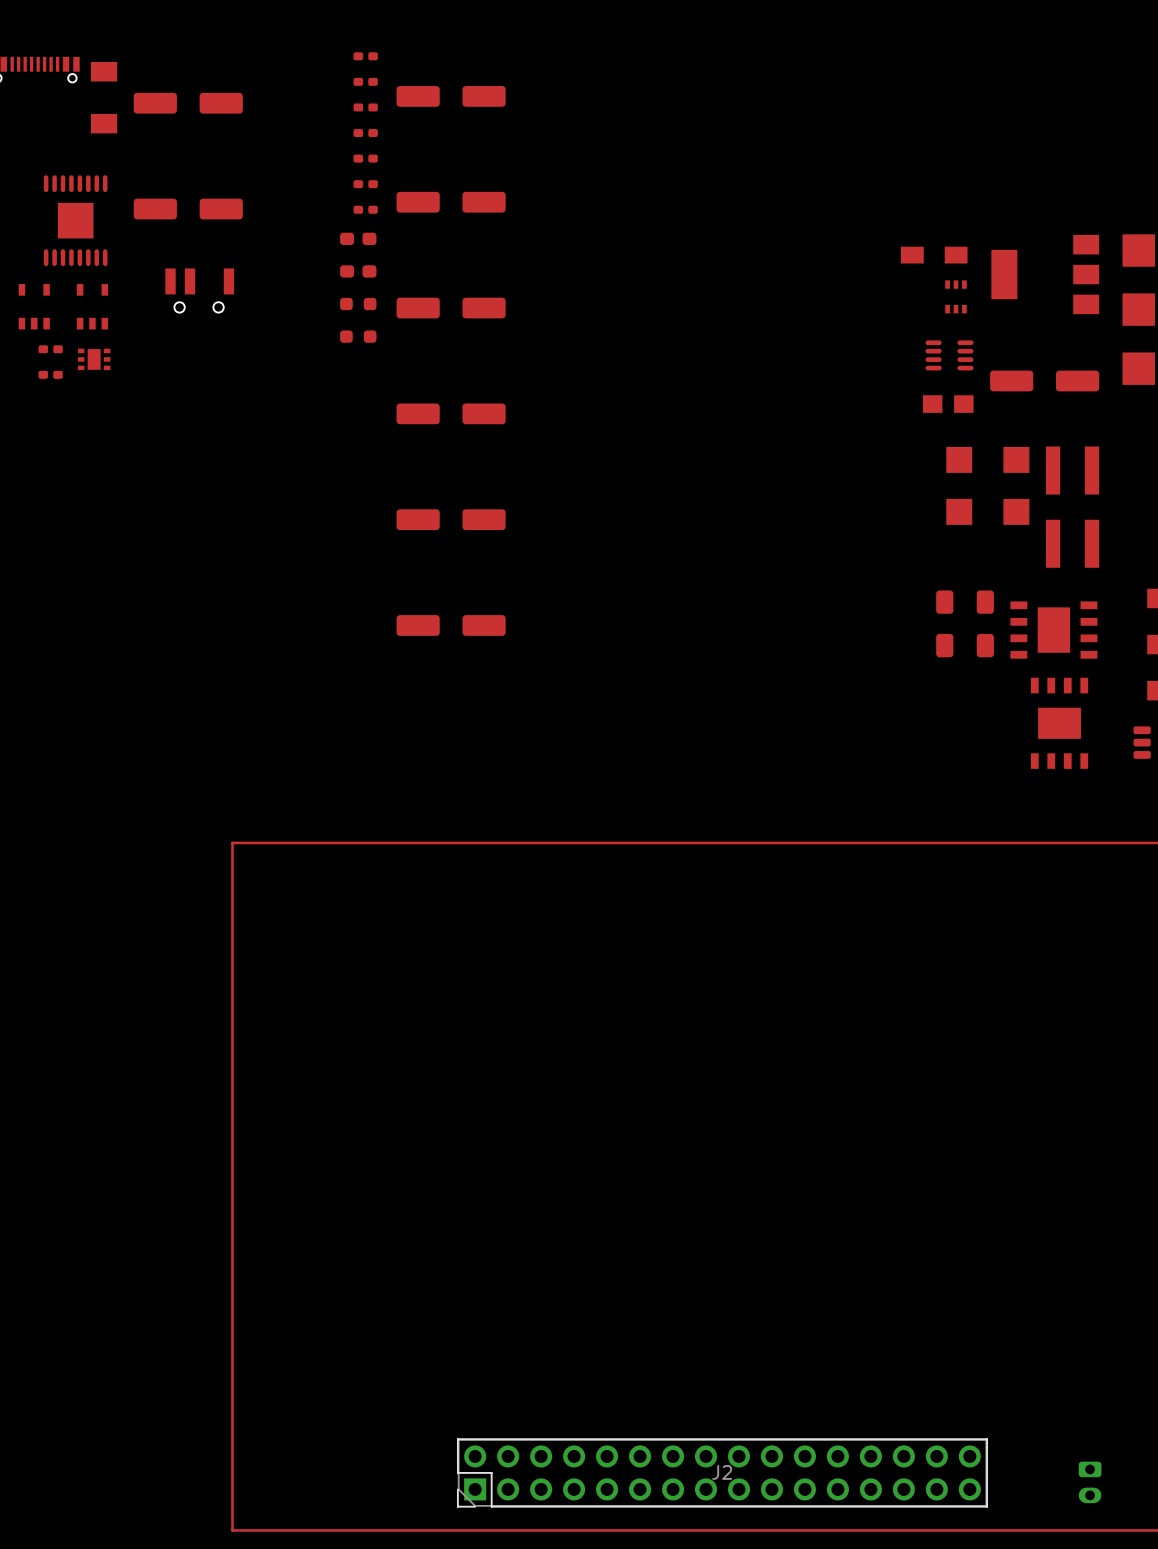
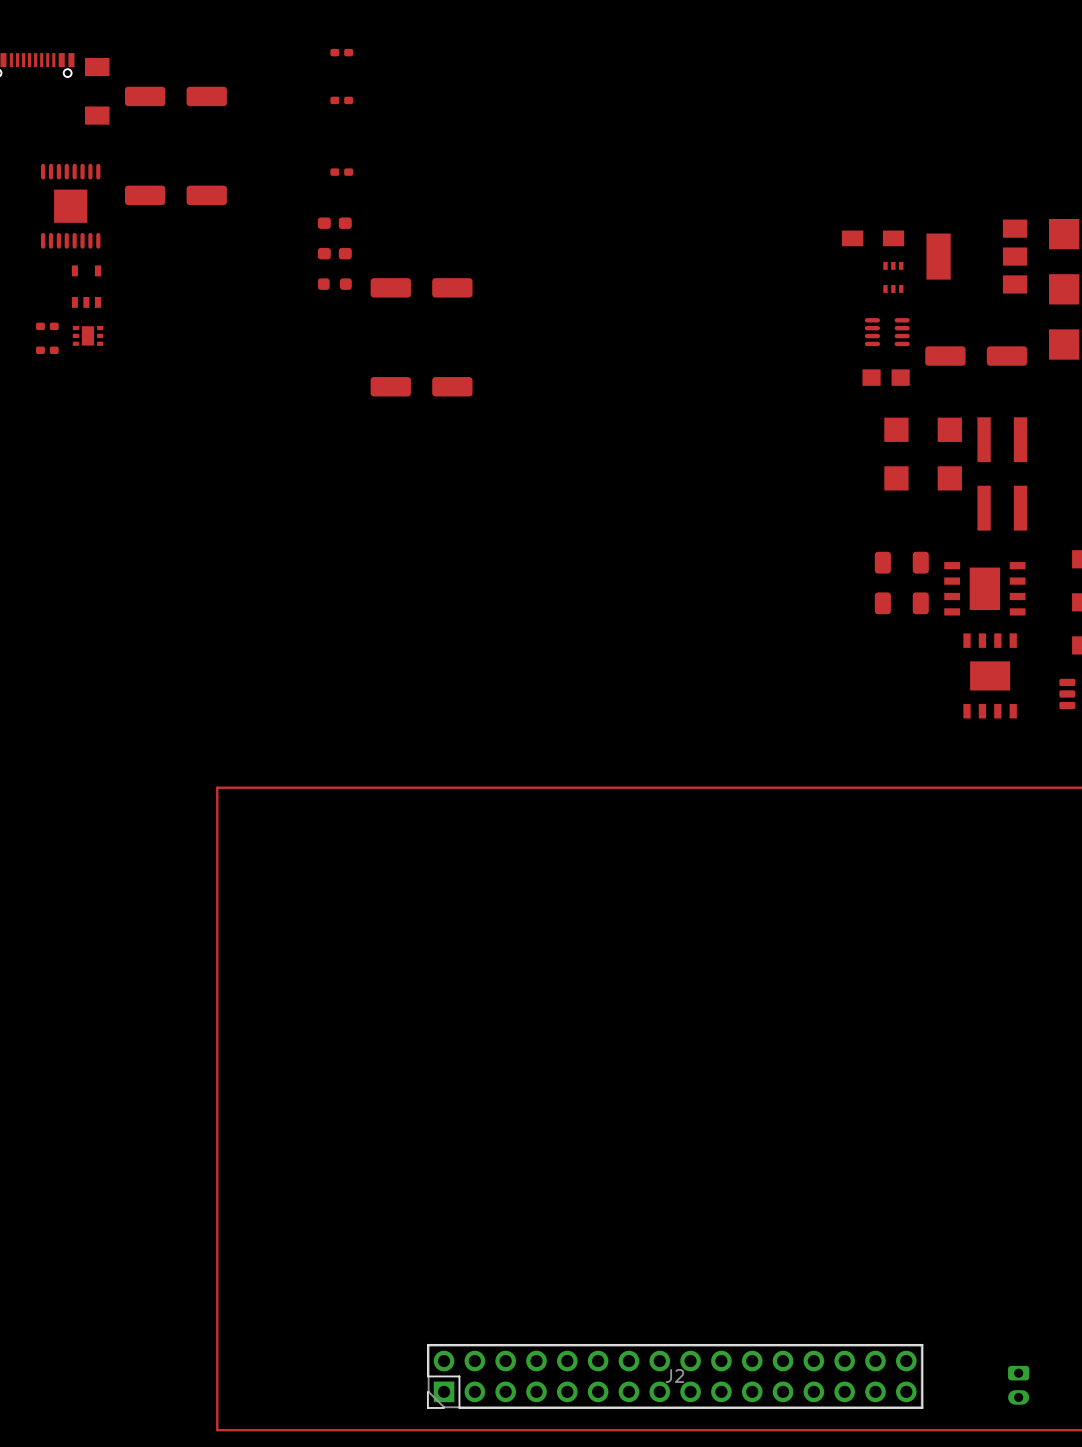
part: (365, 81) -> none
part: (451, 96) -> none
part: (365, 133) -> none
part: (365, 158) -> none
part: (451, 202) -> none
part: (365, 209) -> none
part: (199, 290) -> none
part: (34, 306) -> none
part: (358, 336) -> none
part: (451, 519) -> none
part: (451, 625) -> none

